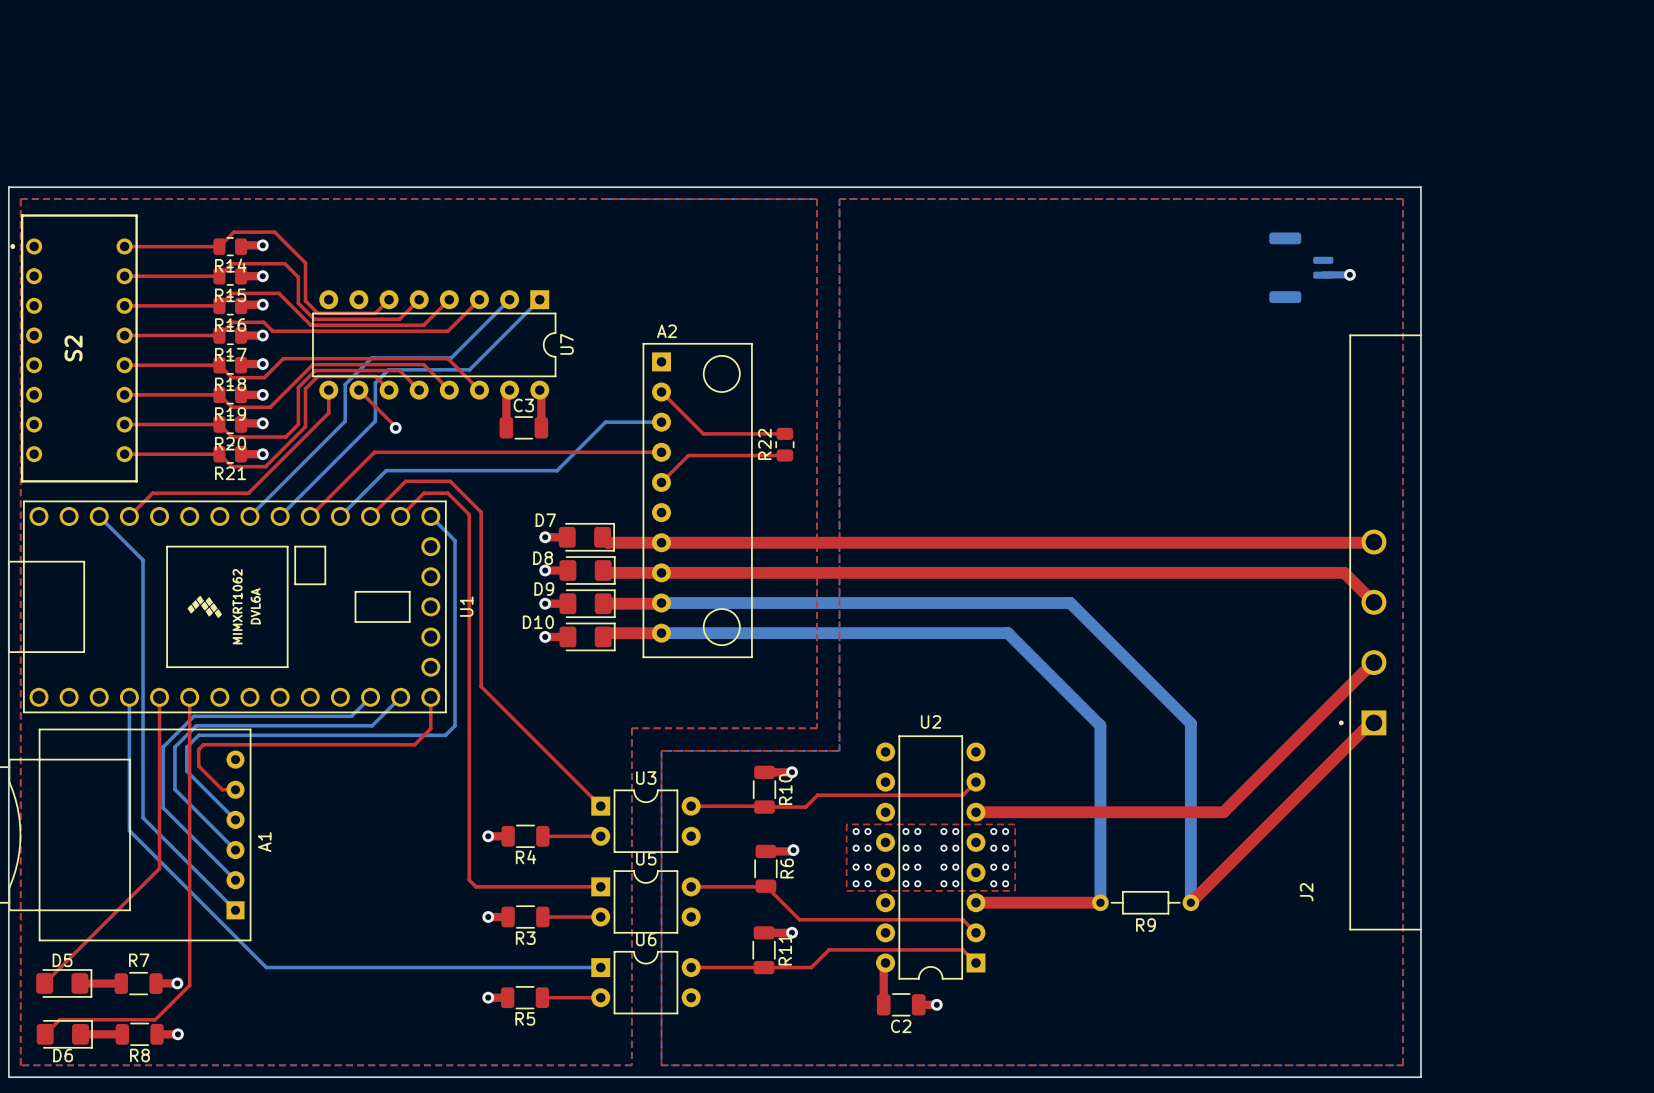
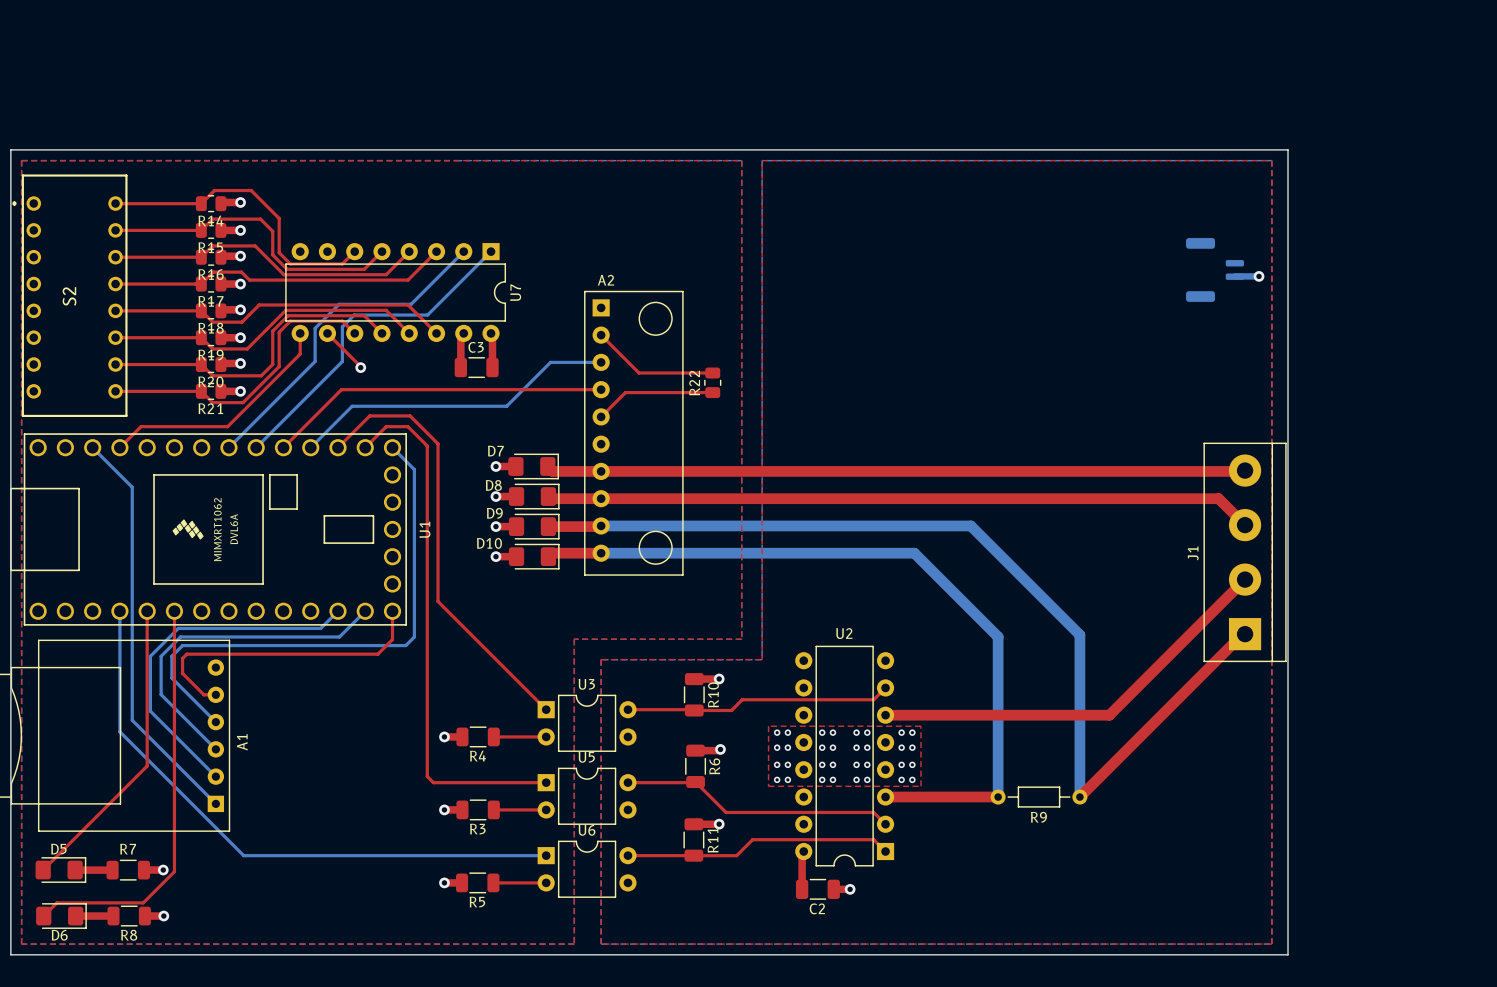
part position: (1301, 267) -> (1215, 269)
bottom track: (1323, 274) (1349, 274) -> (1235, 276) (1259, 276)
via position: (1349, 274) -> (1259, 276)
J1: none -> (1245, 552)
J2: (1380, 632) -> none

